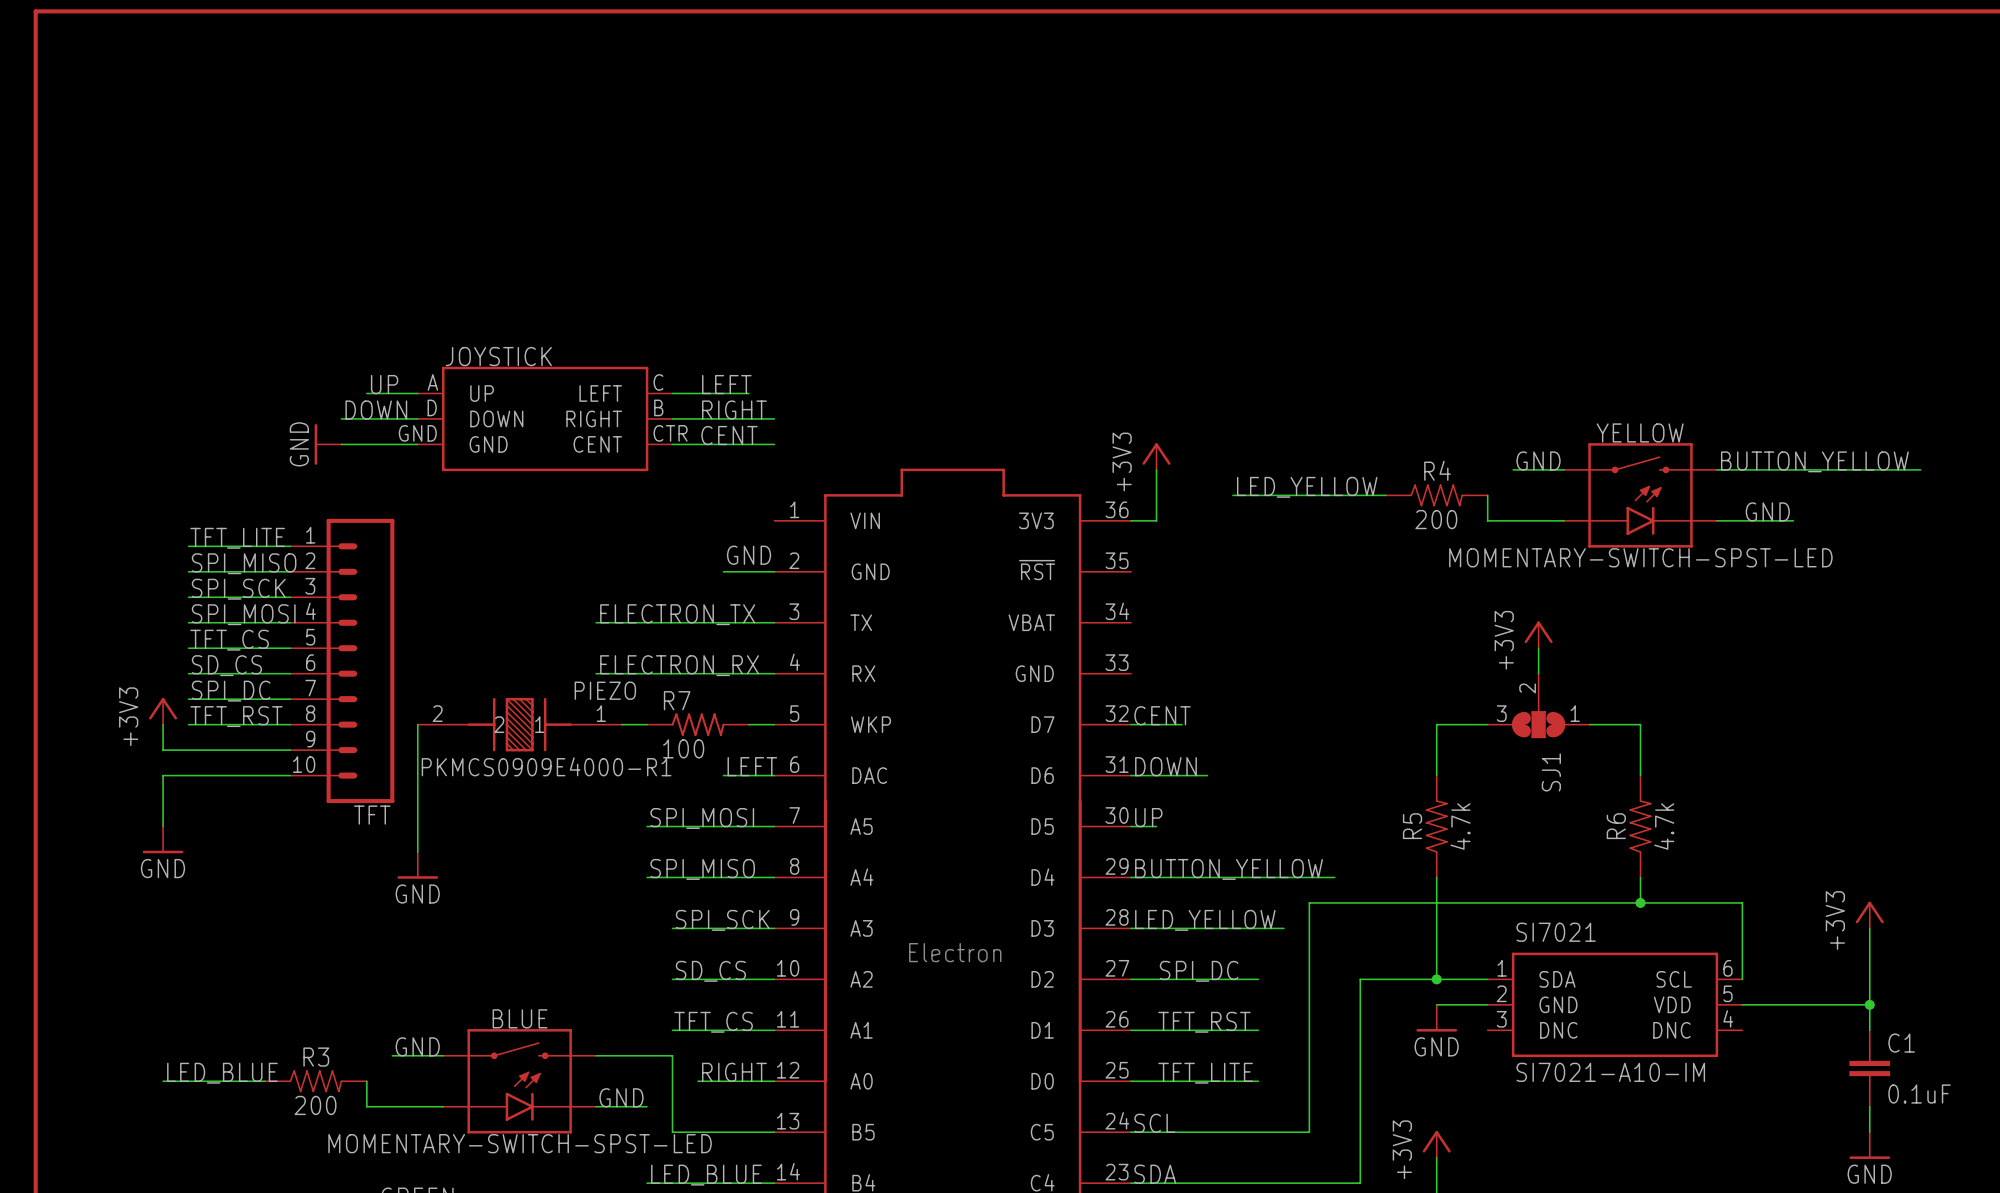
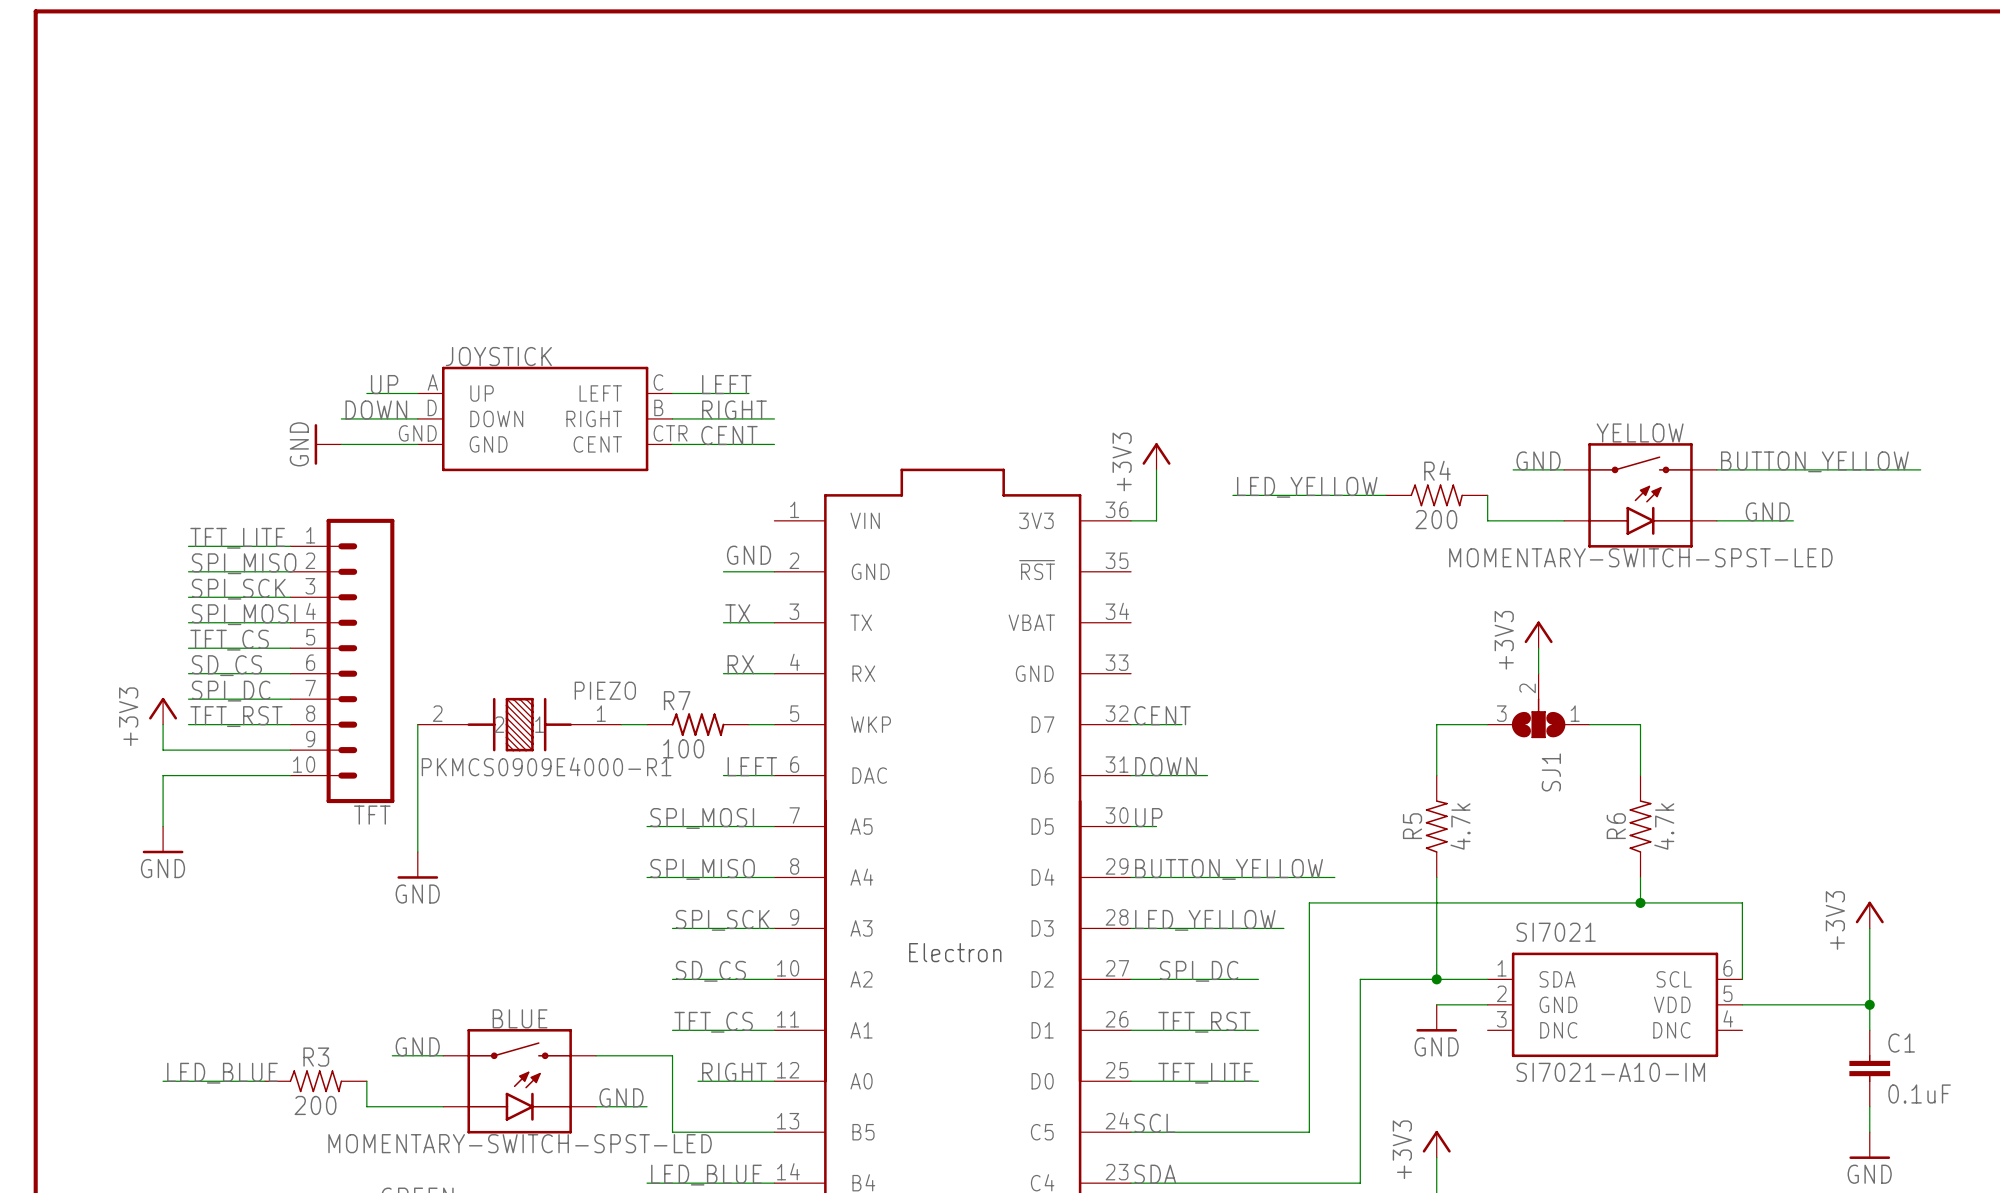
label: none -> TX (737, 613)
label: ELECTRON_TX (677, 614) -> none
wire: (596, 622) (723, 622) -> none
label: none -> RX (740, 664)
label: ELECTRON_RX (679, 665) -> none
wire: (596, 673) (723, 673) -> none

